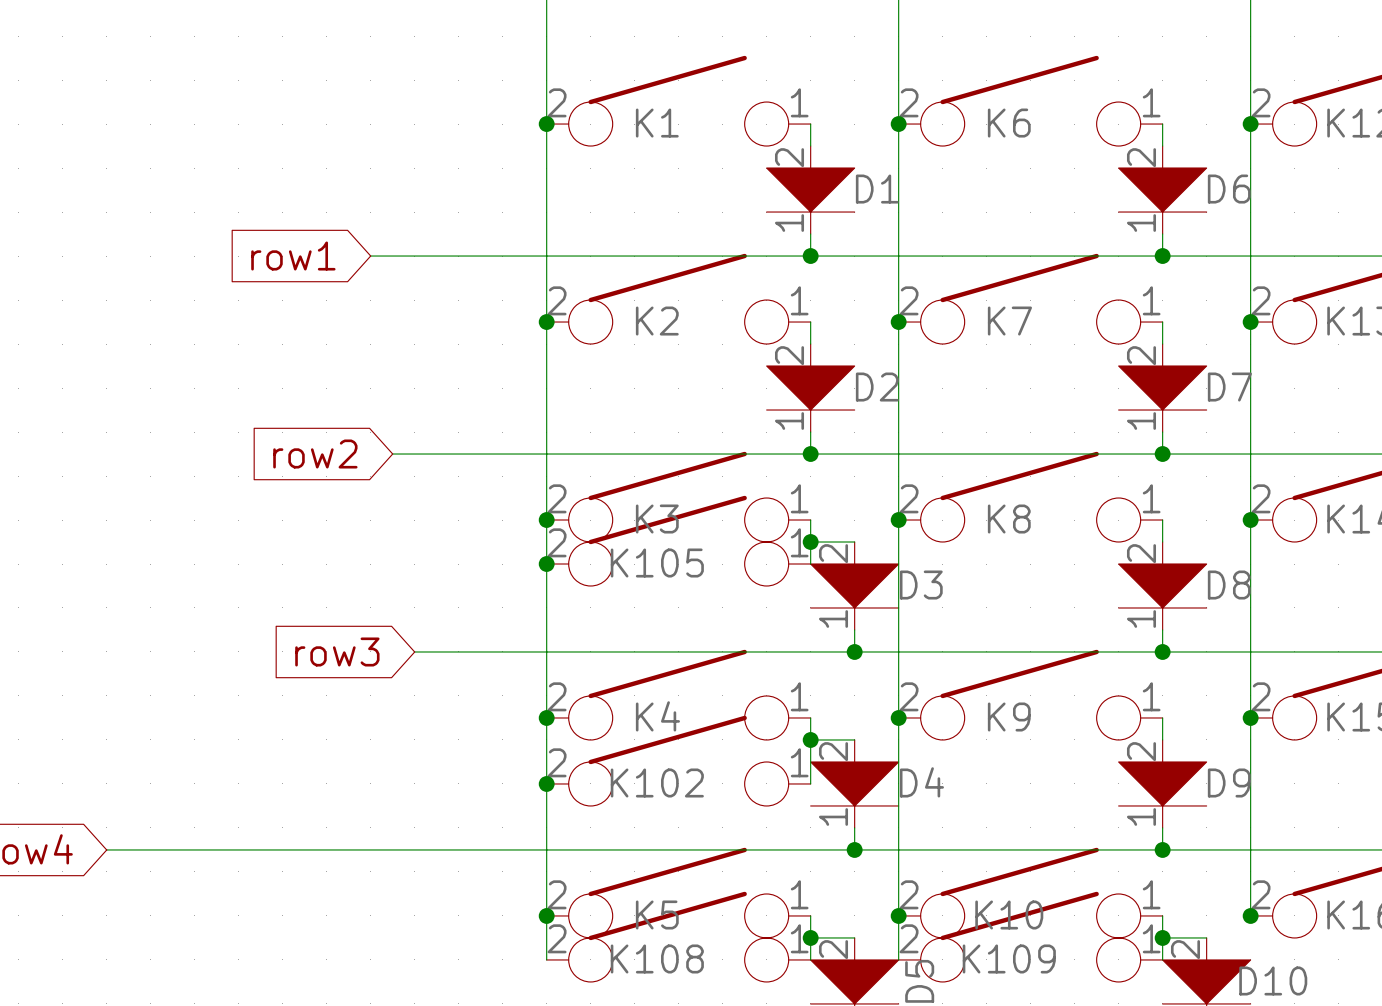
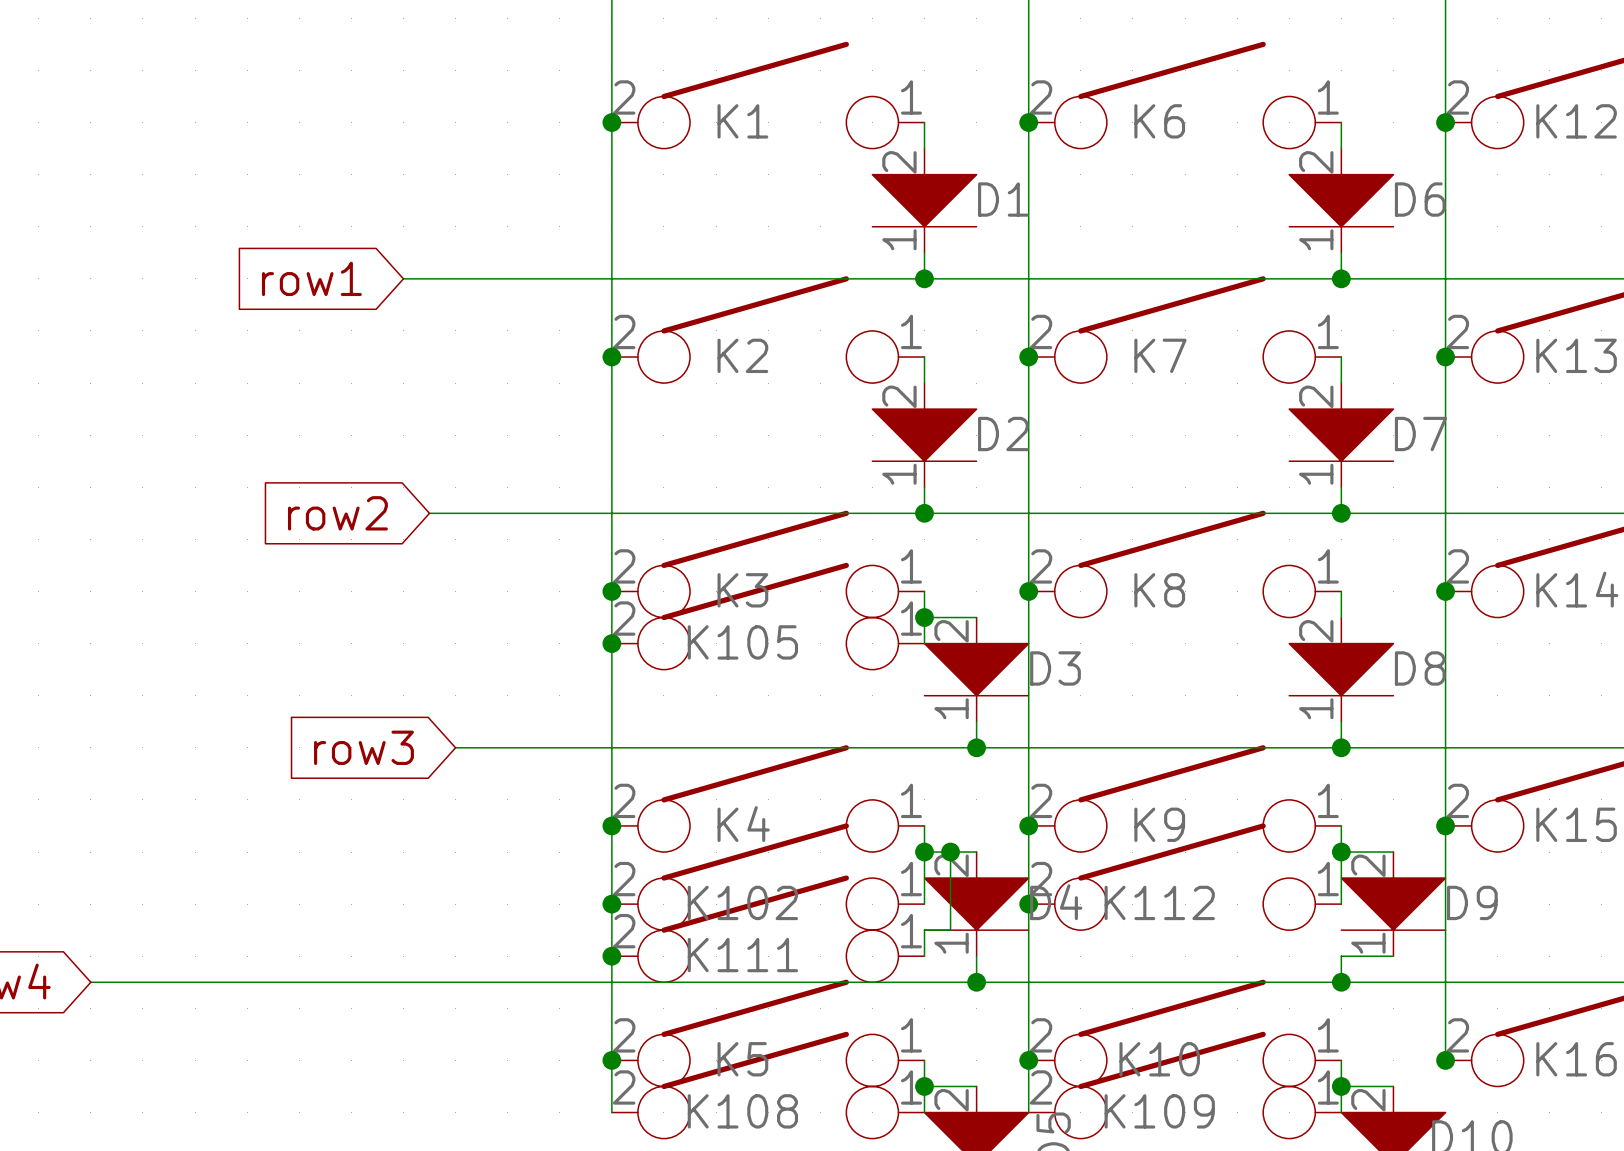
wire: none -> (950, 852) (950, 930) (924, 930) (924, 956)
junction: none -> (950, 852)
junction: none -> (1341, 852)
wire: none -> (1393, 852) (1341, 852) (1341, 904)
K112: none -> (1185, 876)
junction: none -> (1028, 904)
D9 position: (1162, 783) -> (1393, 904)
K111: none -> (768, 928)
junction: none -> (611, 956)
wire: none -> (1341, 956) (1393, 956)

